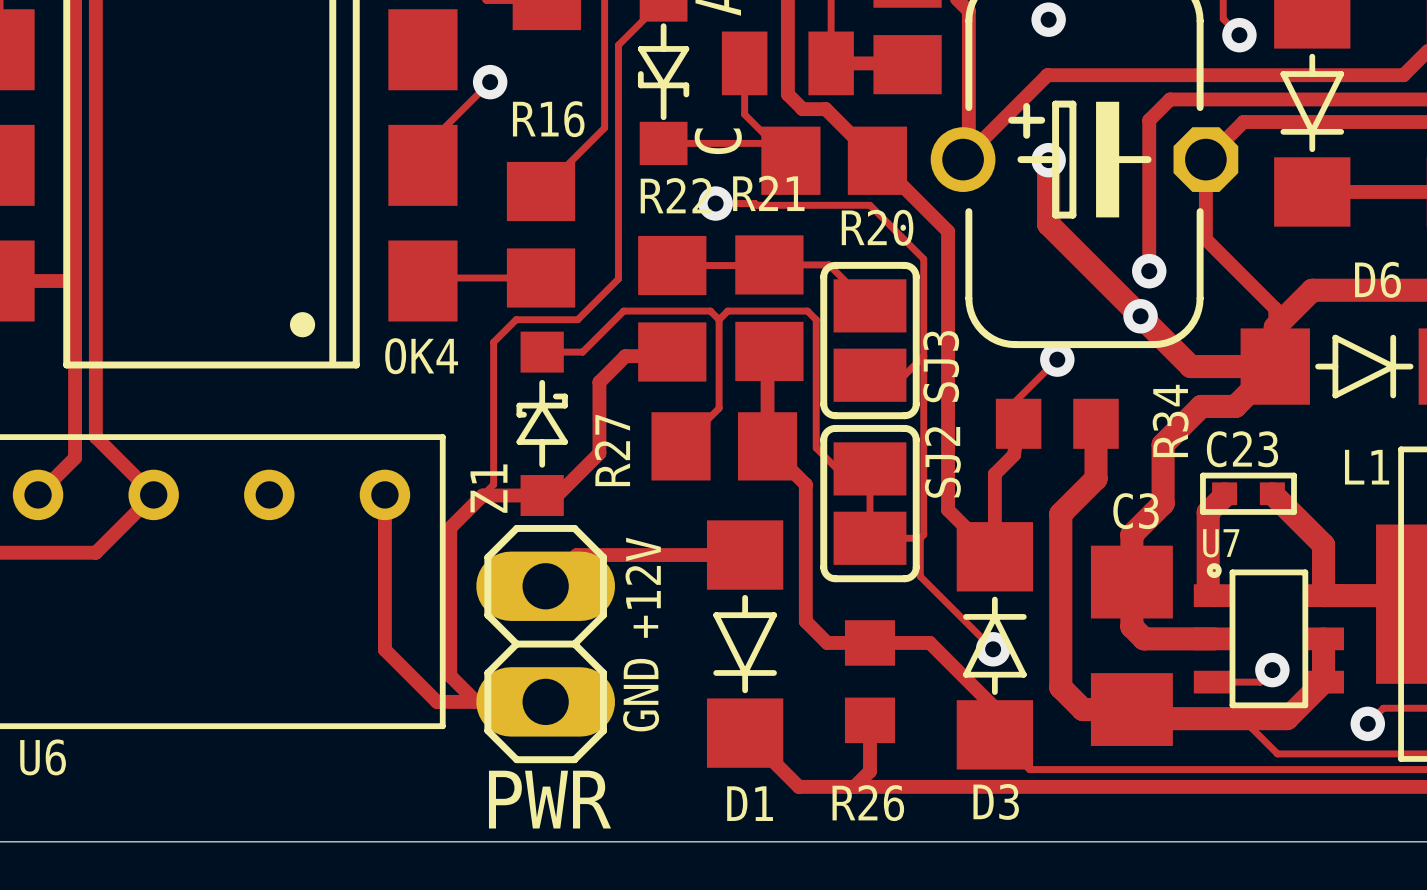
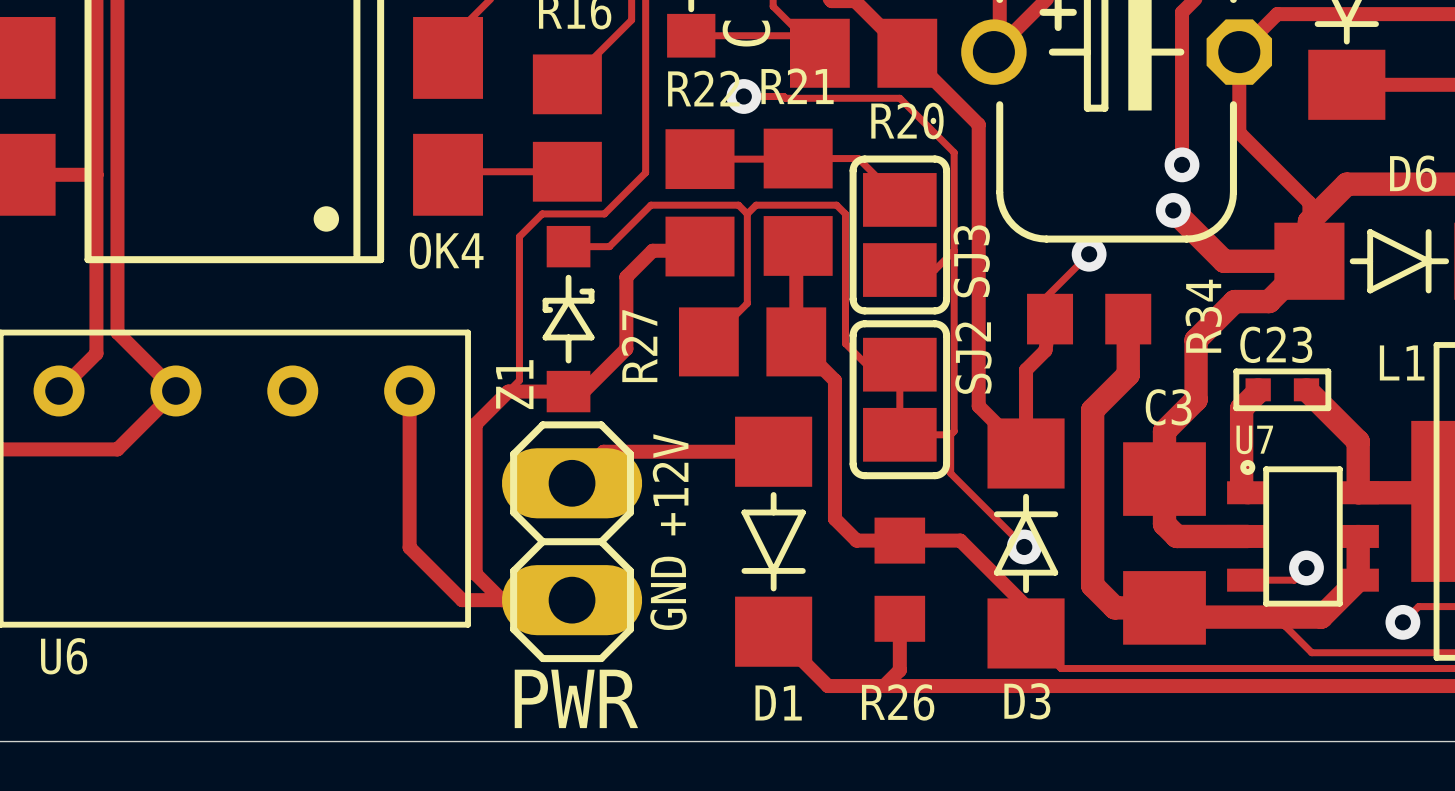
track: (1048, 160) (1048, 224) (1140, 316) -> none
via: (1048, 160) -> none

